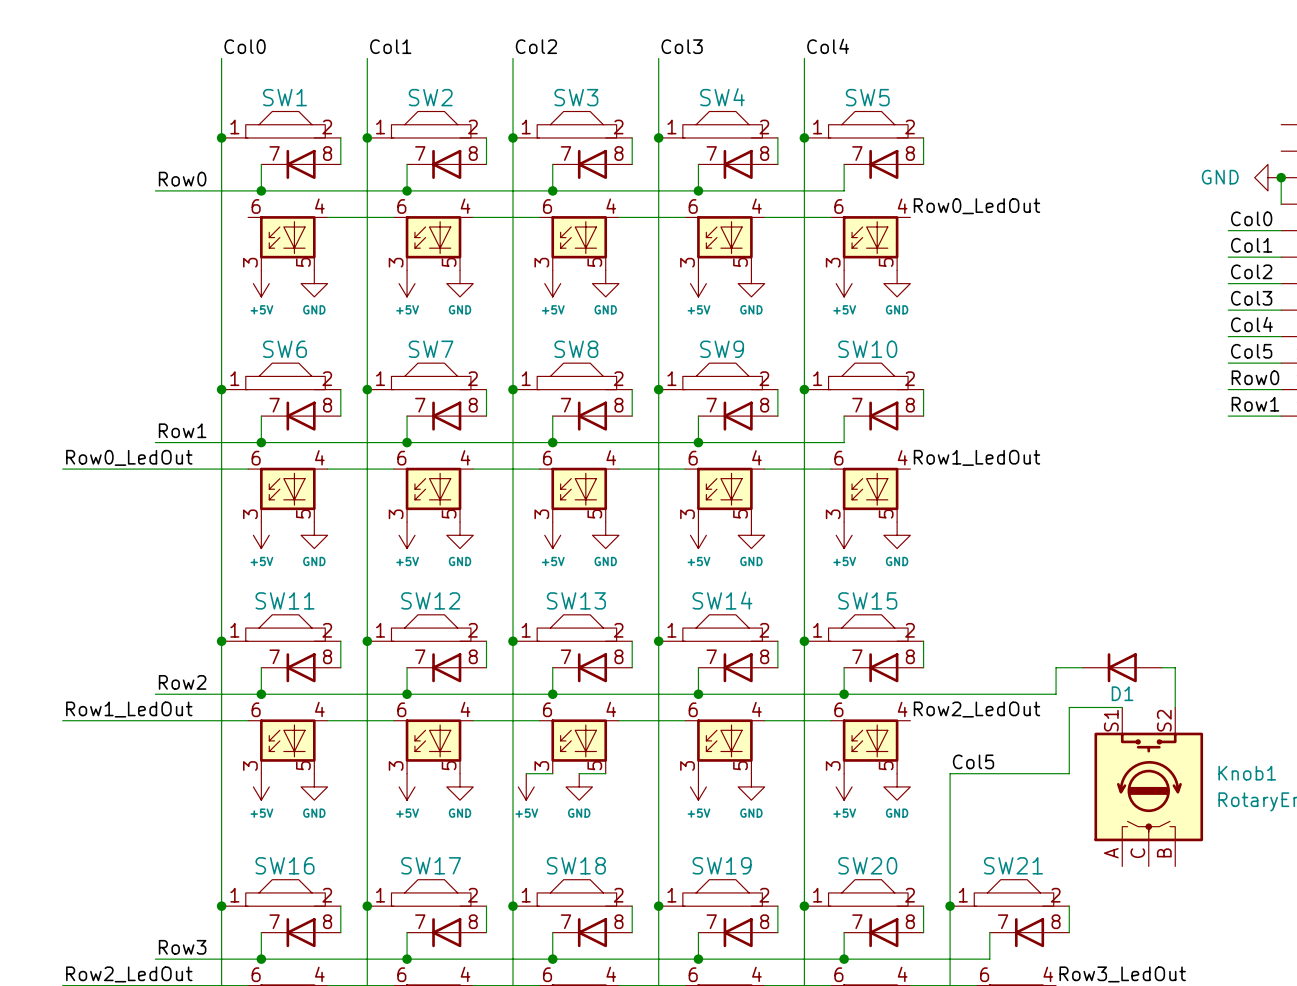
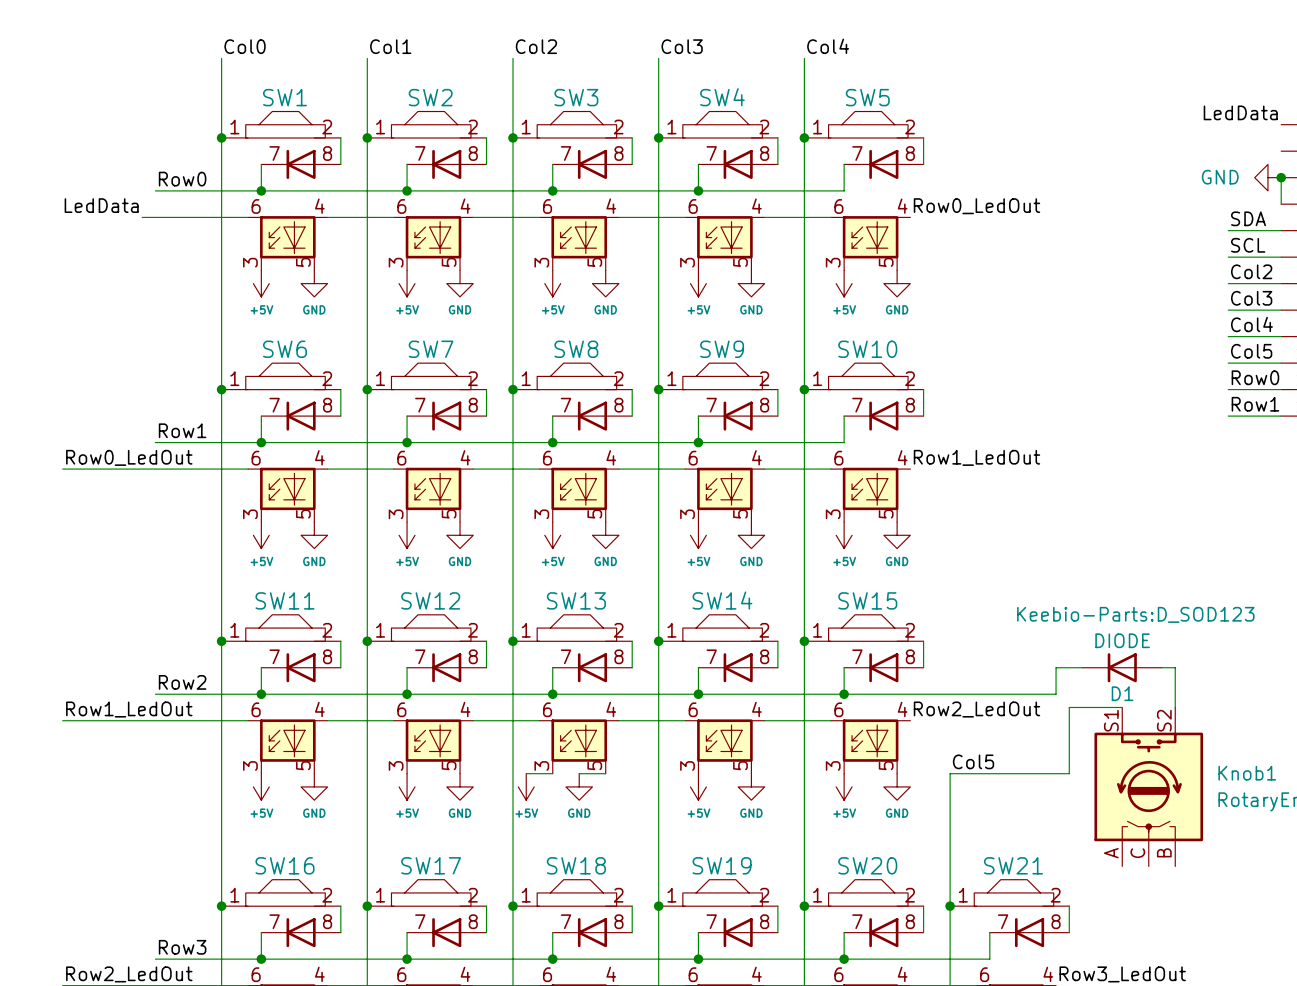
label: none -> LedData (1240, 112)
label: none -> LedData (101, 205)
wire: none -> (142, 217) (248, 217)
label: Col0 (1251, 218) -> SDA (1248, 218)
label: Col1 (1251, 245) -> SCL (1248, 245)
D1 text: none -> Keebio-Parts:D_SOD123 (1135, 614)
D1 value: none -> DIODE (1122, 640)

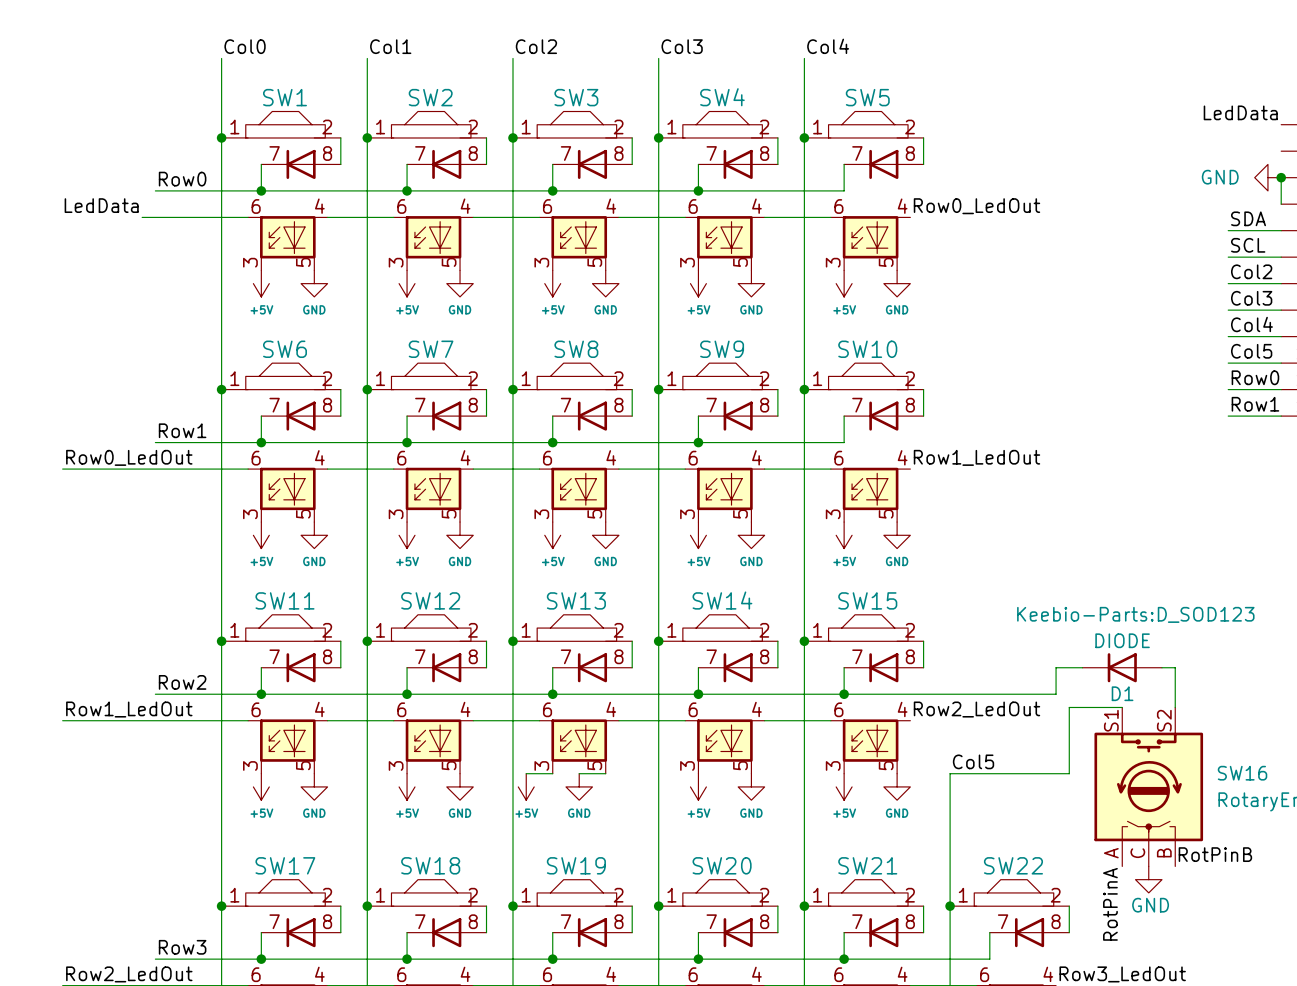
Knob1 name: Knob1 (1247, 773) -> SW16 (1242, 773)
label: none -> RotPinB (1215, 854)
SW16 name: SW16 (284, 865) -> SW17 (285, 865)
SW17 name: SW17 (431, 865) -> SW18 (430, 865)
SW18 name: SW18 (576, 865) -> SW19 (576, 865)
SW19 name: SW19 (722, 865) -> SW20 (722, 865)
SW20 name: SW20 (867, 865) -> SW21 (867, 865)
SW21 name: SW21 (1013, 865) -> SW22 (1013, 865)
power symbol: none -> GND (1148, 879)
label: none -> RotPinA (1110, 904)

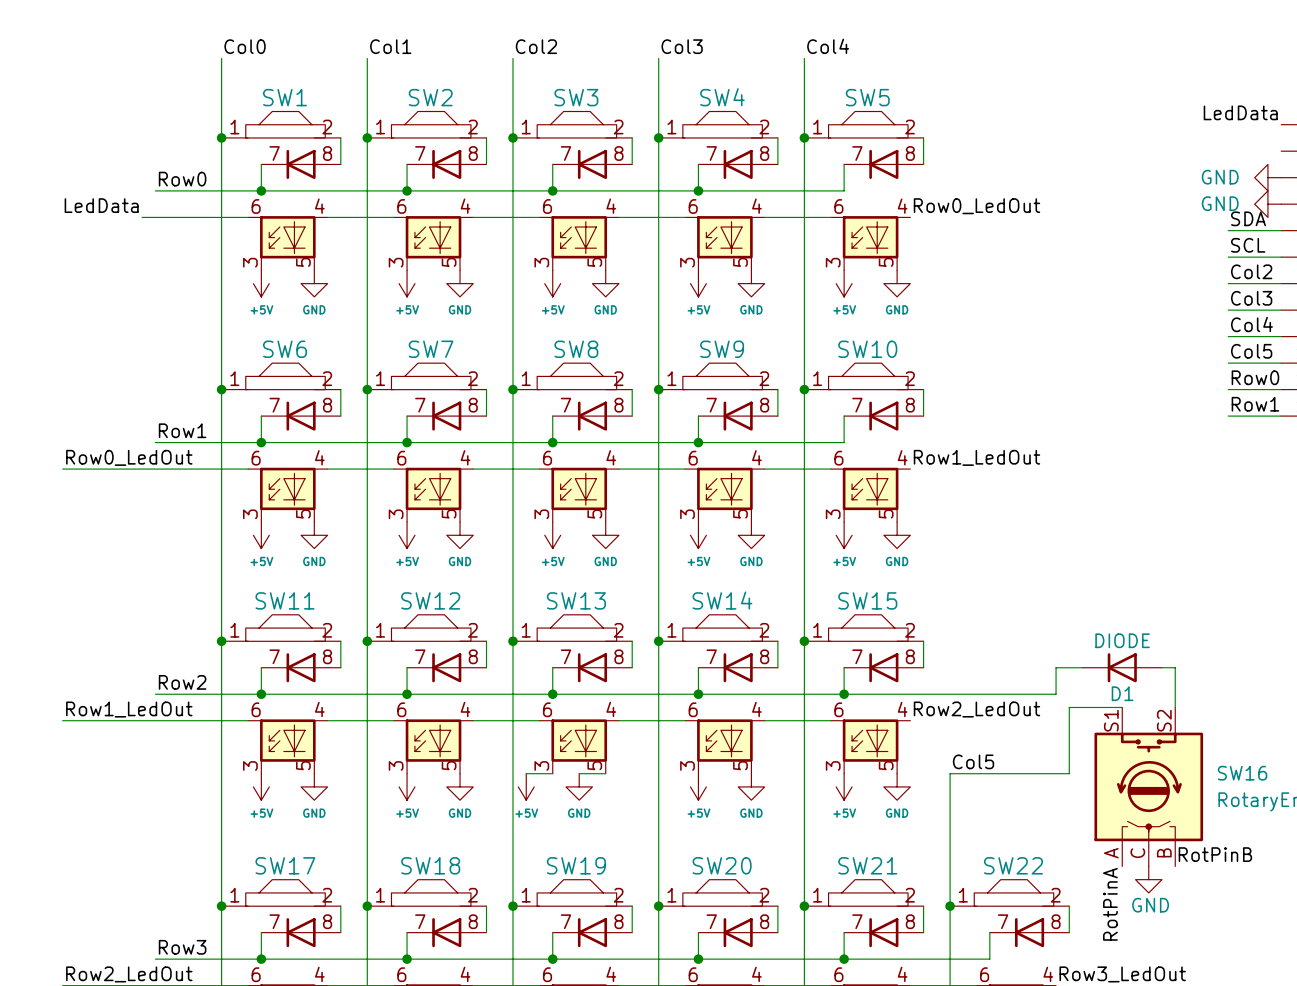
wire: (1281, 177) (1281, 204) -> none
junction: (1281, 177) -> none
power symbol: none -> GND (1267, 204)
D1 text: Keebio-Parts:D_SOD123 (1135, 614) -> none

